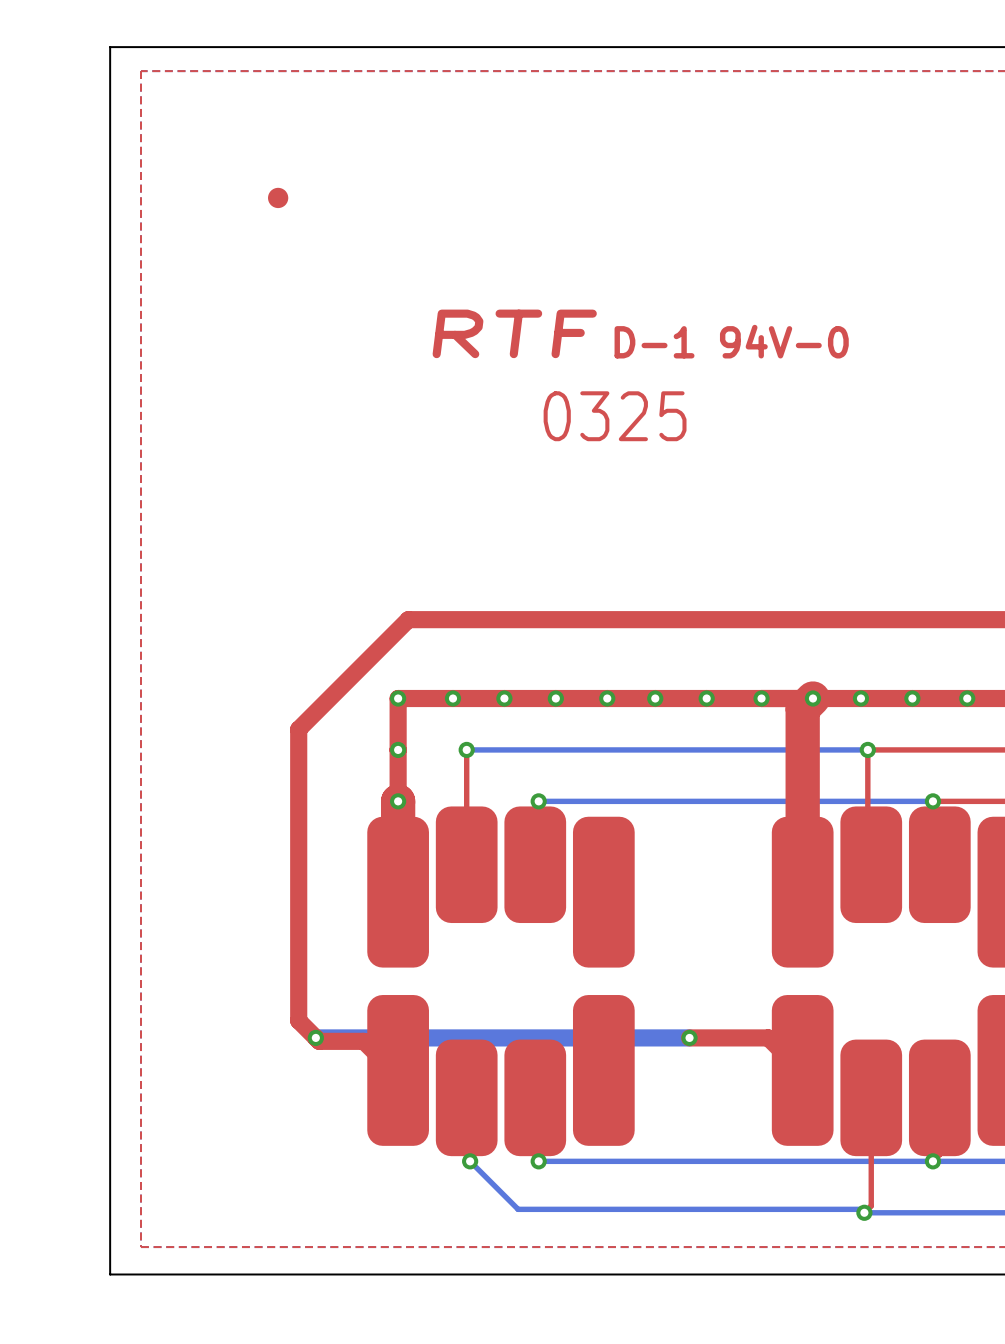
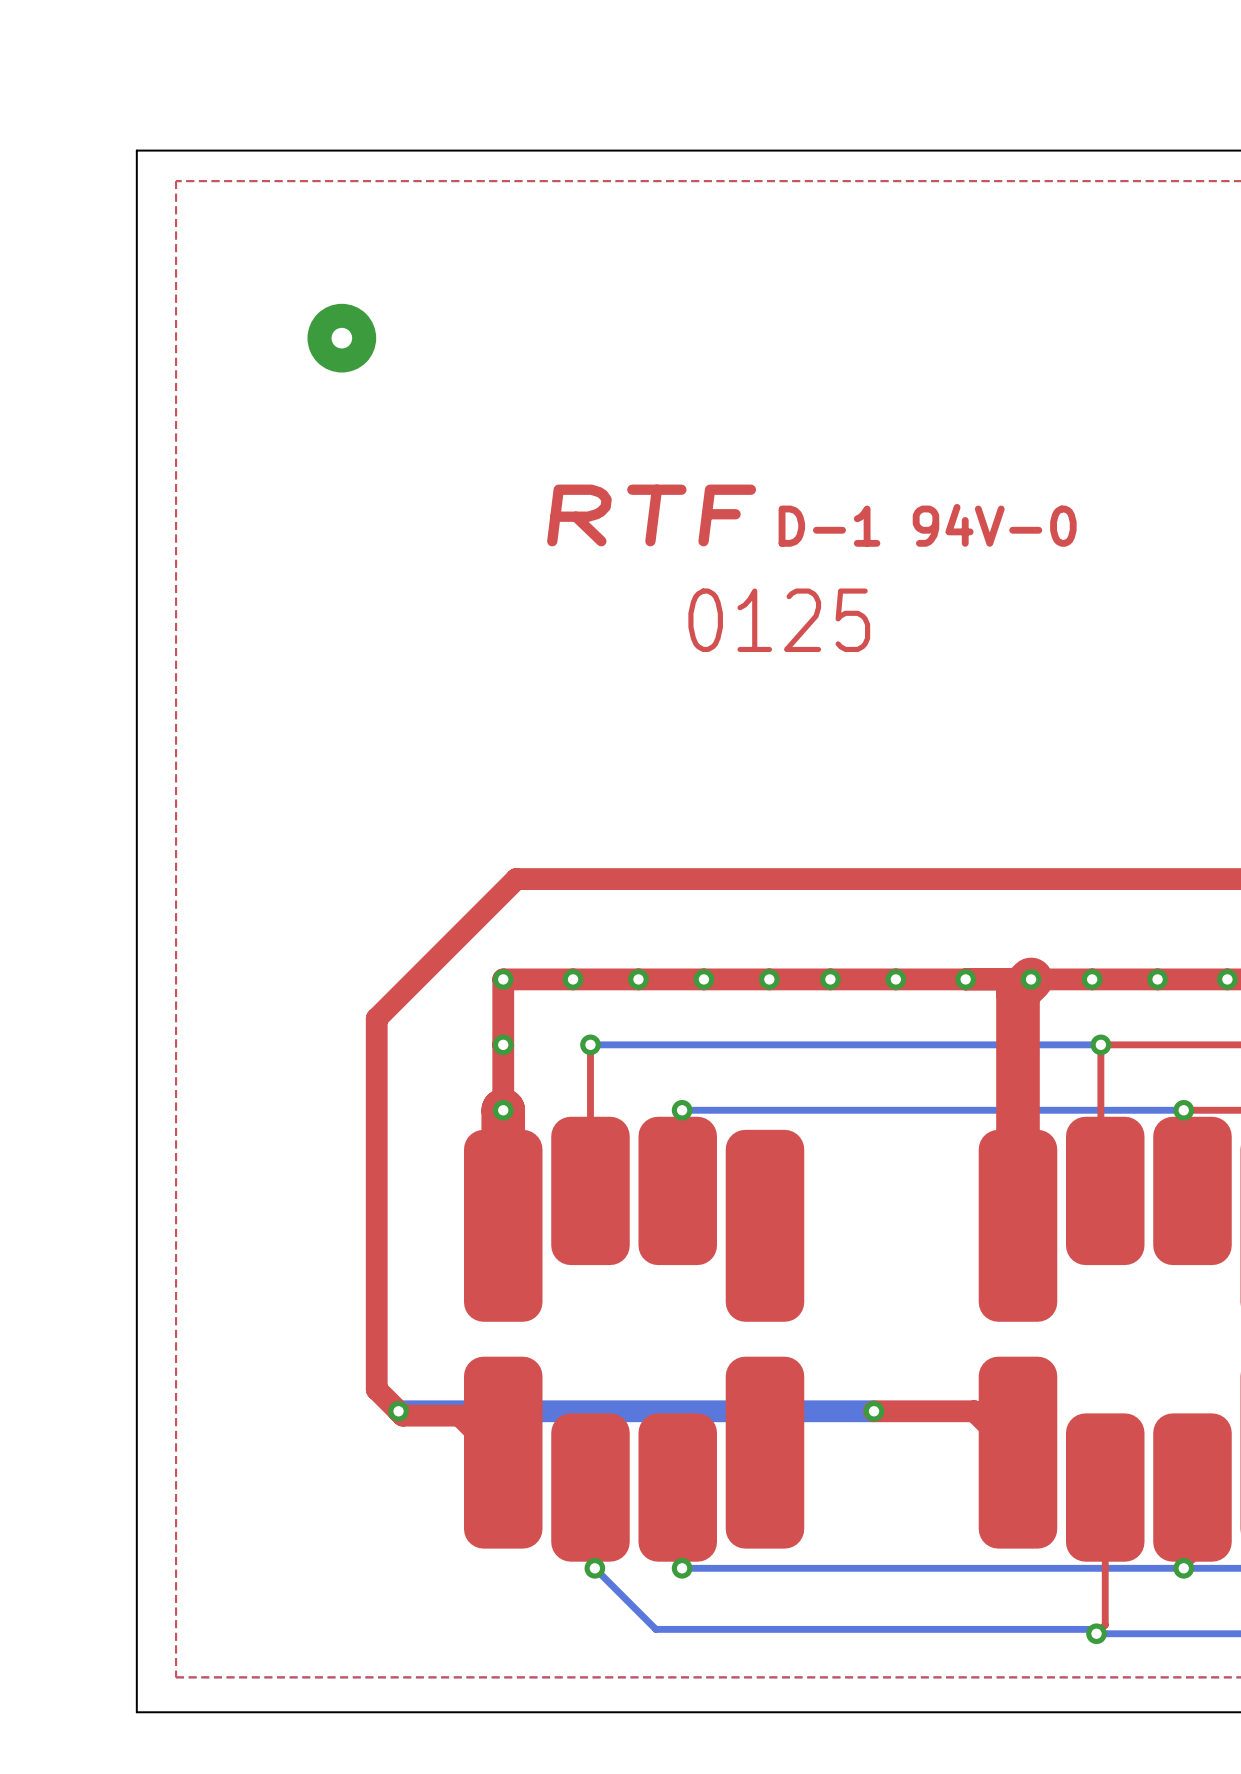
via: none -> (341, 338)
part: (278, 197) -> none
text: 0325 (615, 416) -> 0125 (779, 620)

